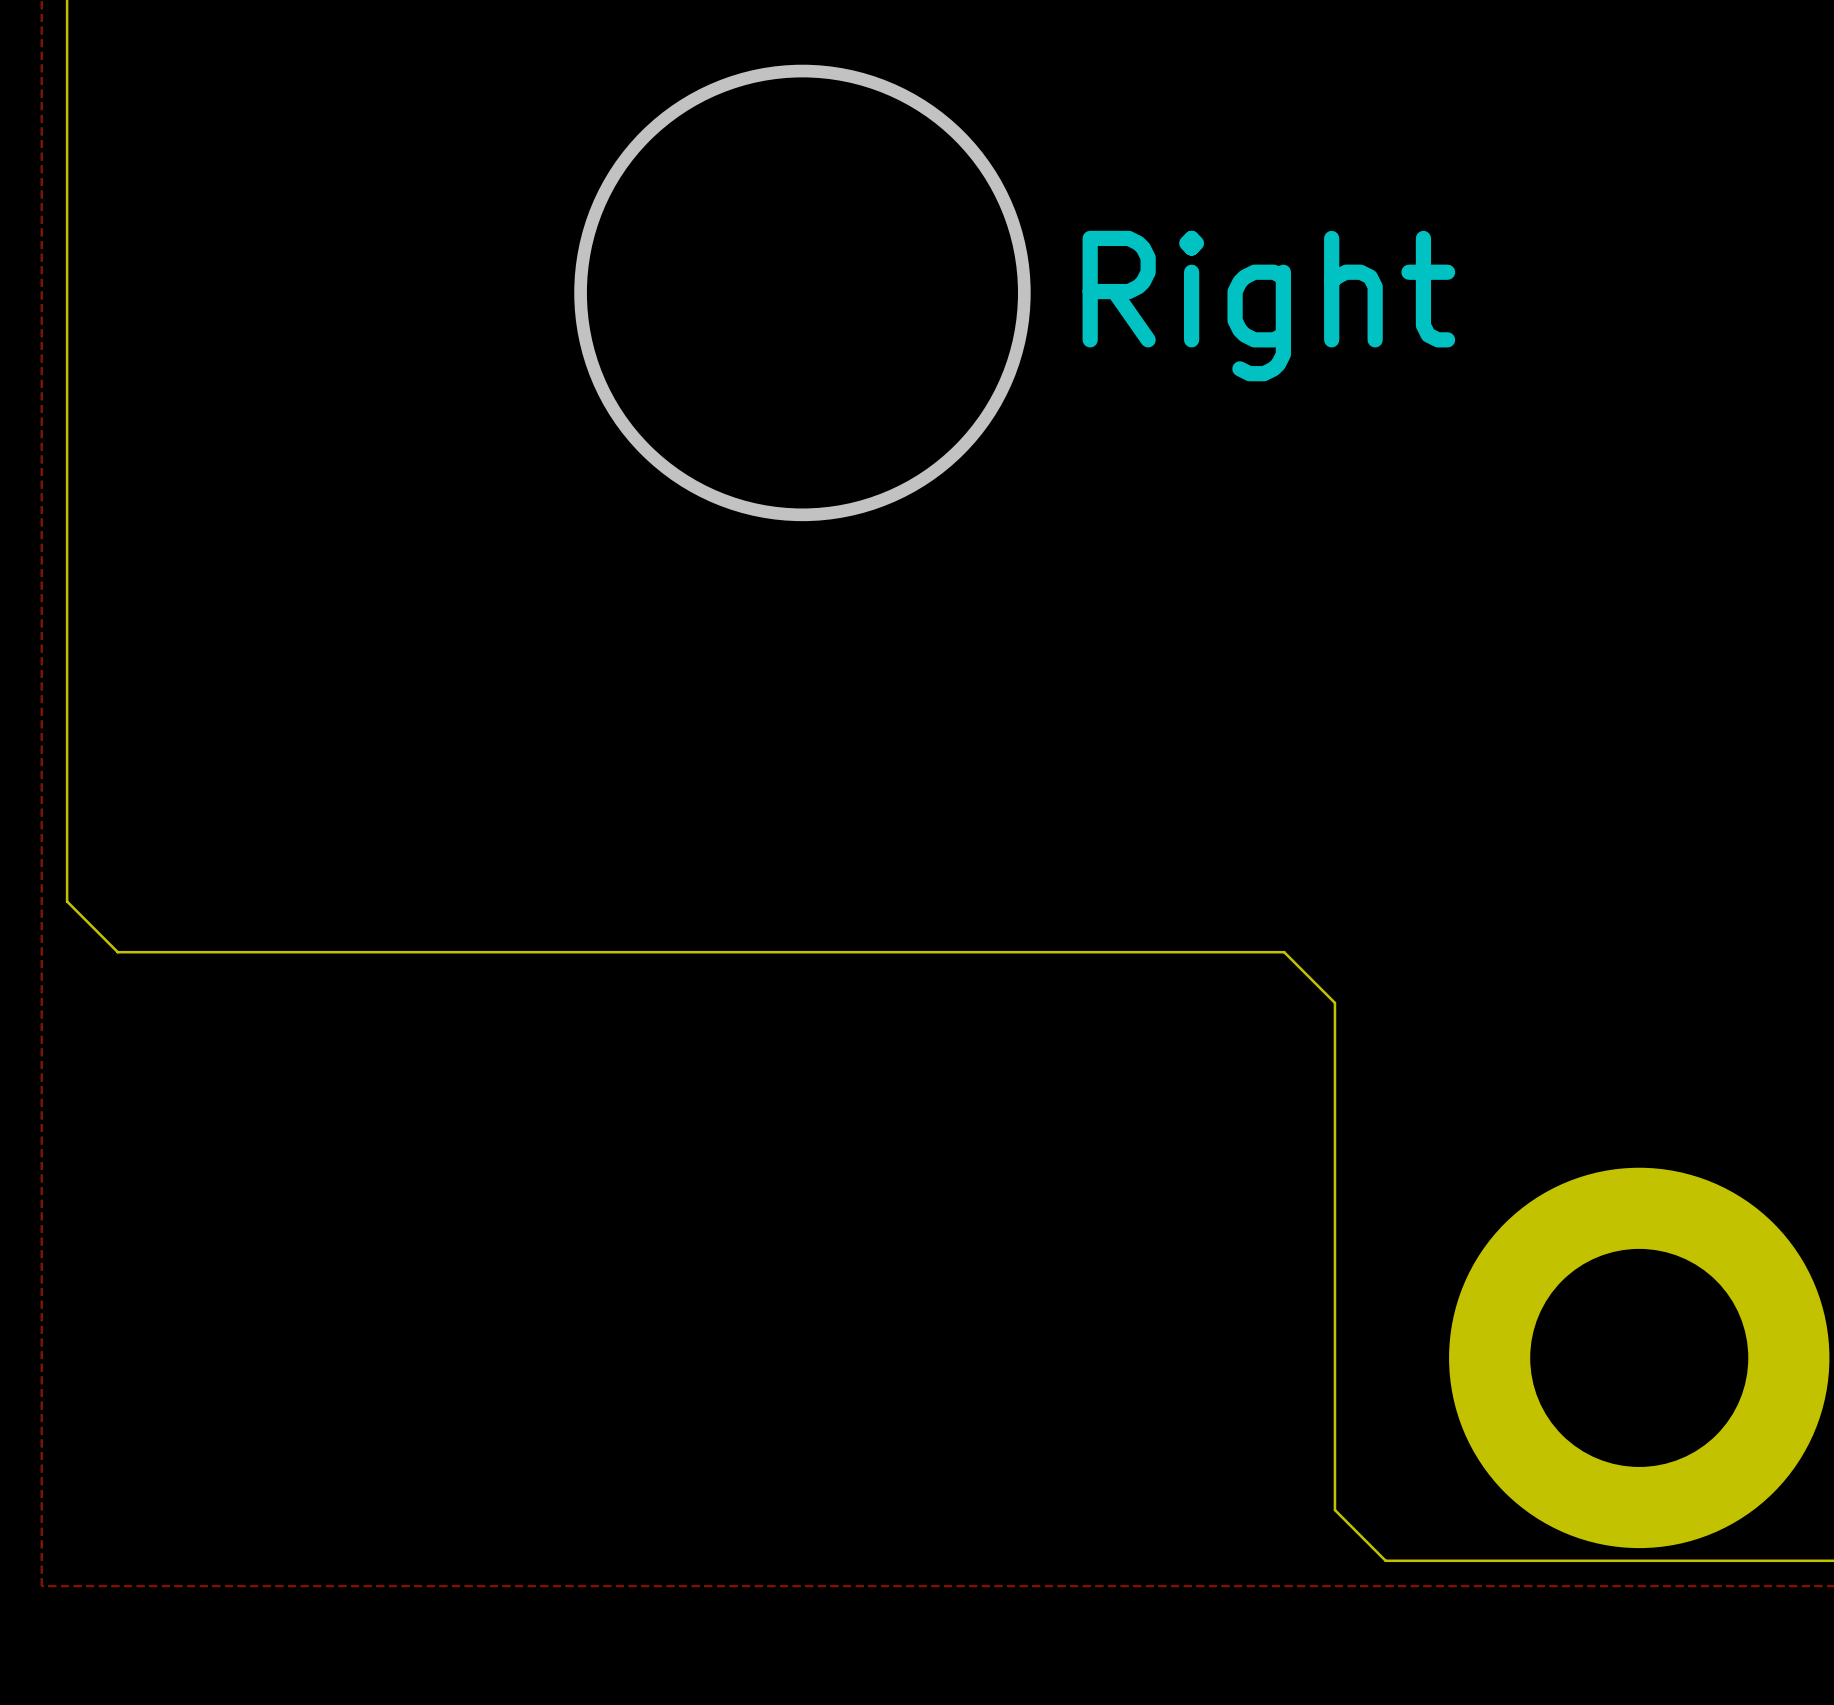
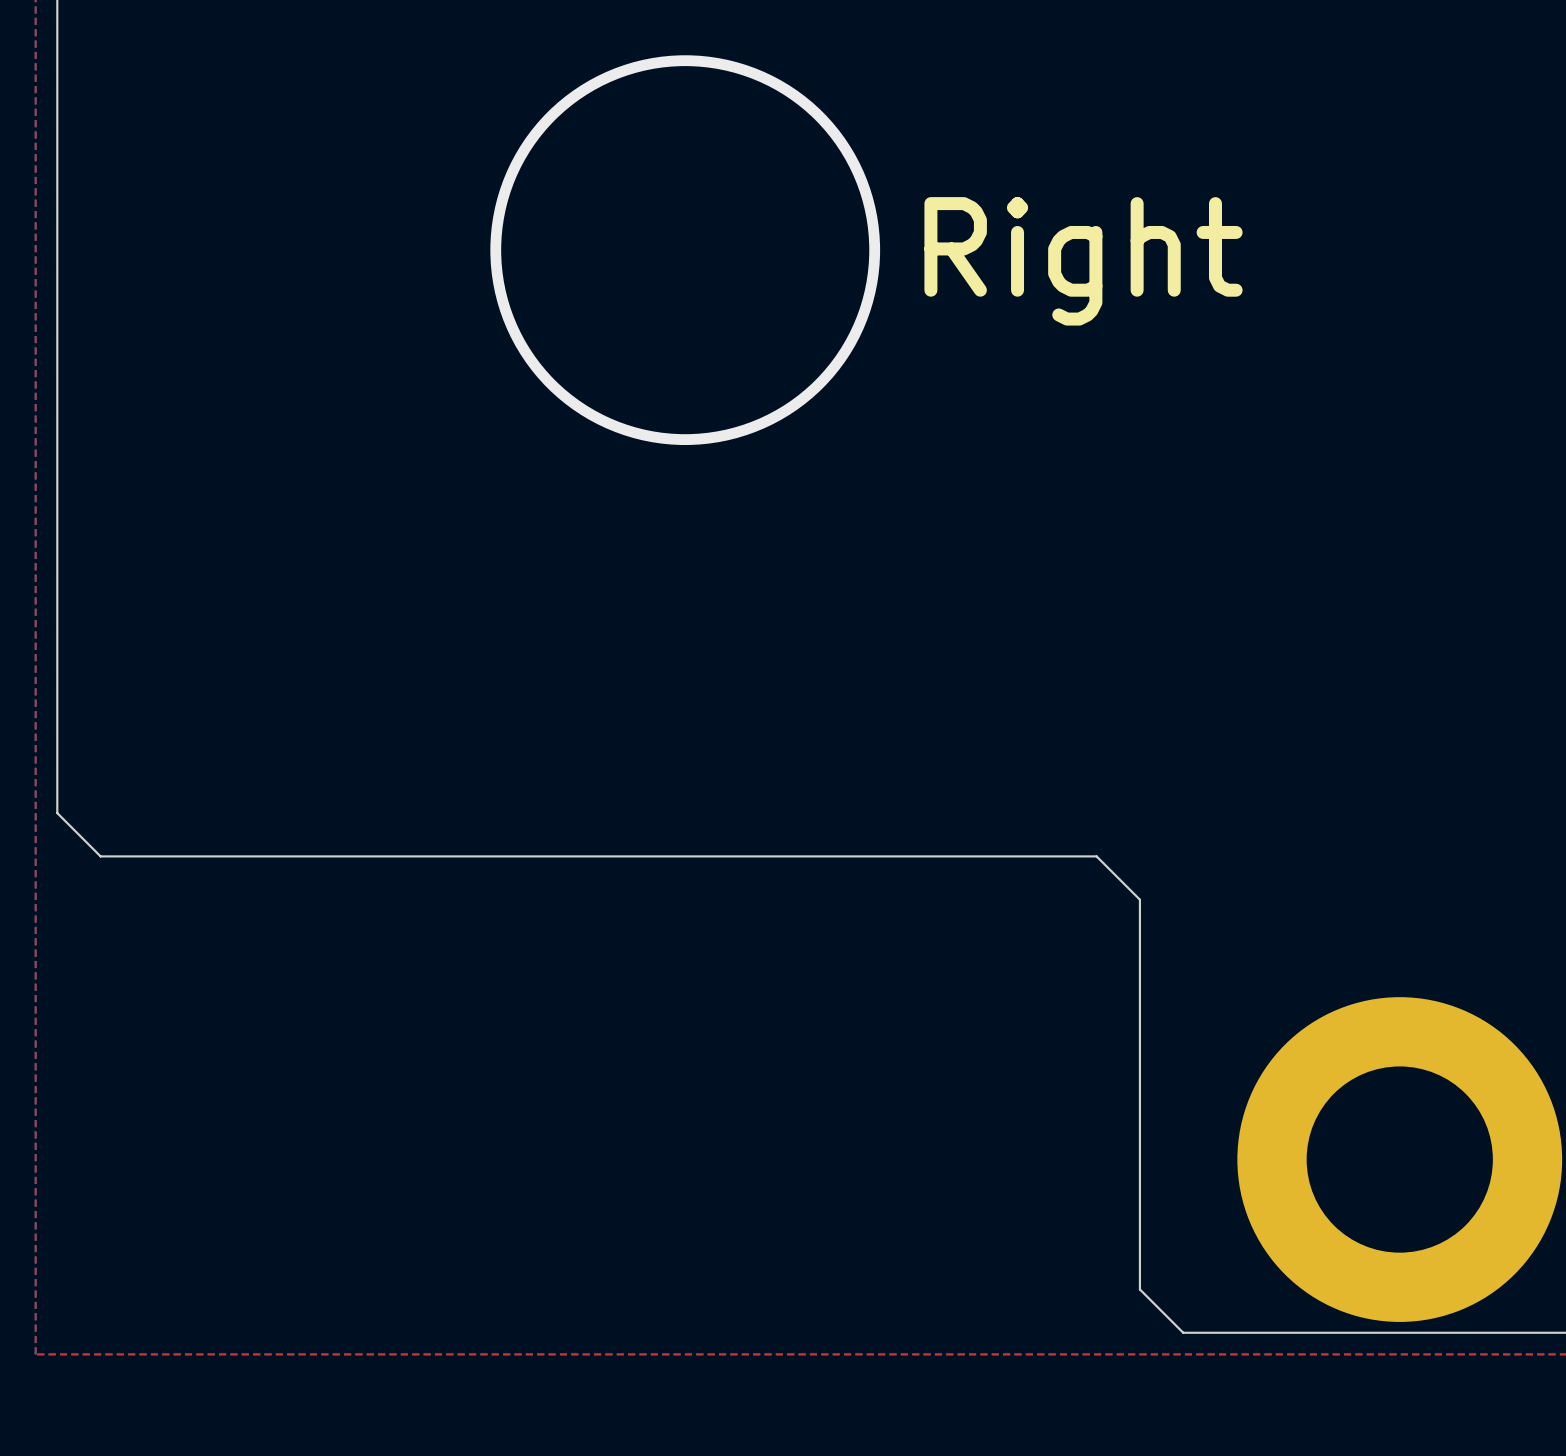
board edge: (67, 901) (117, 952) (1284, 952) (1334, 1002) (1334, 1053) -> (57, 769) (57, 813) (100, 856) (1096, 856) (1139, 899)

